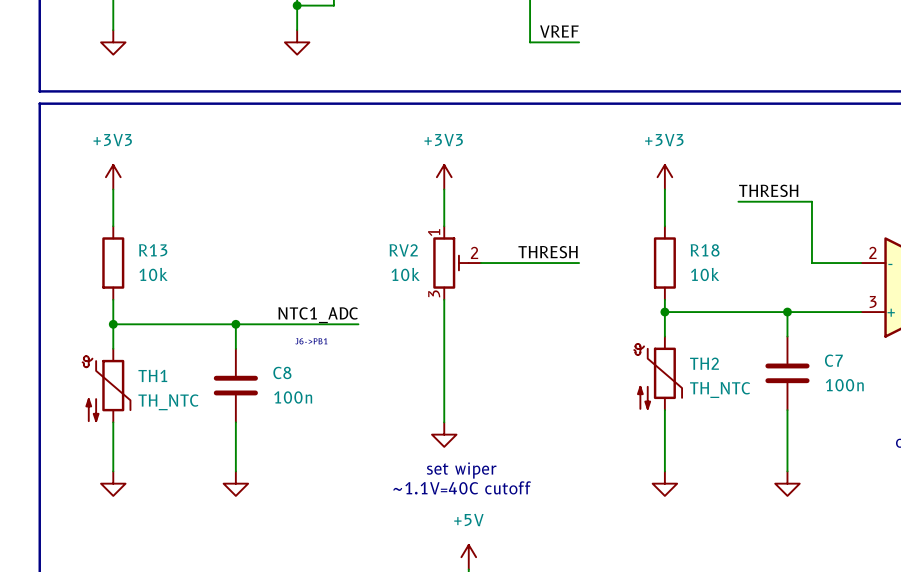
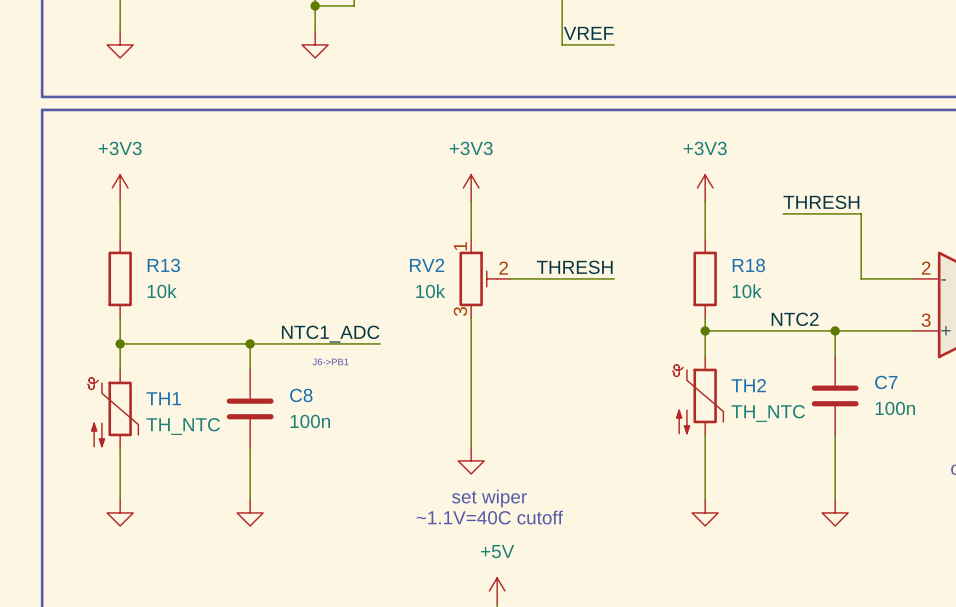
label: none -> NTC2 (795, 319)

